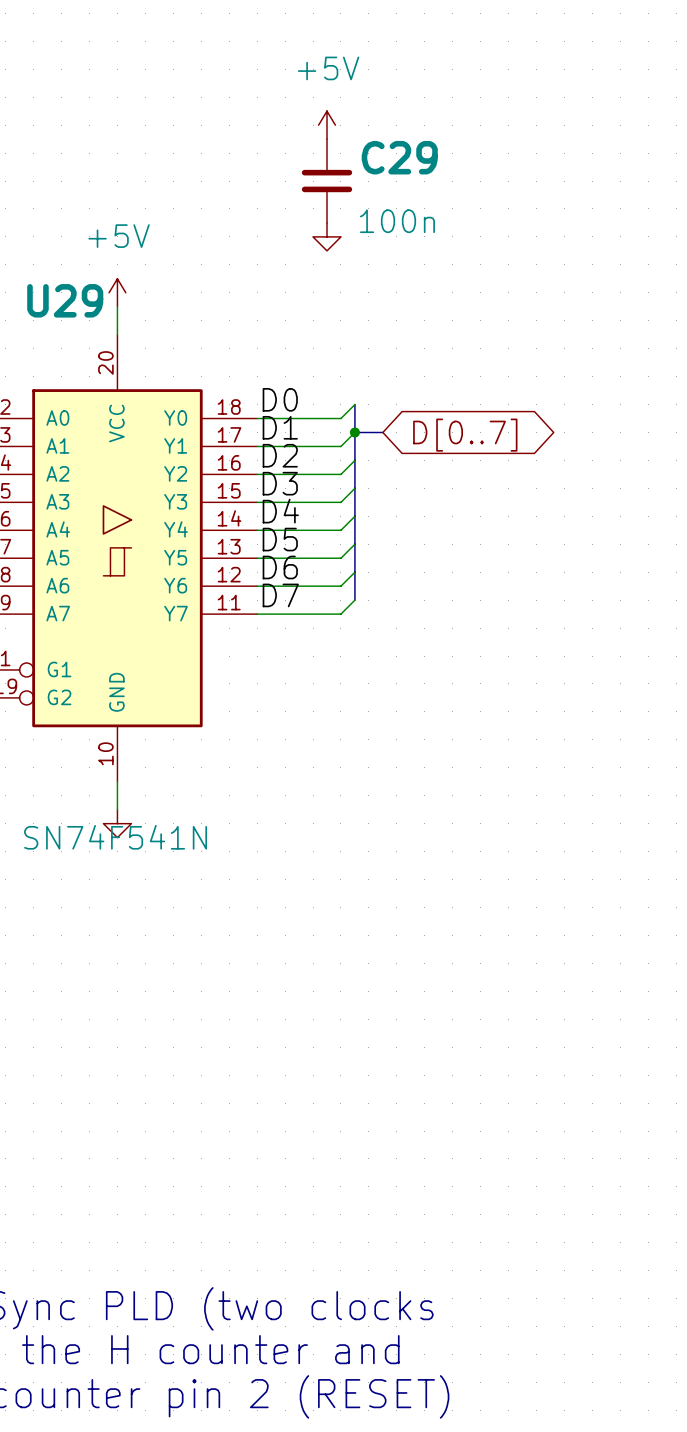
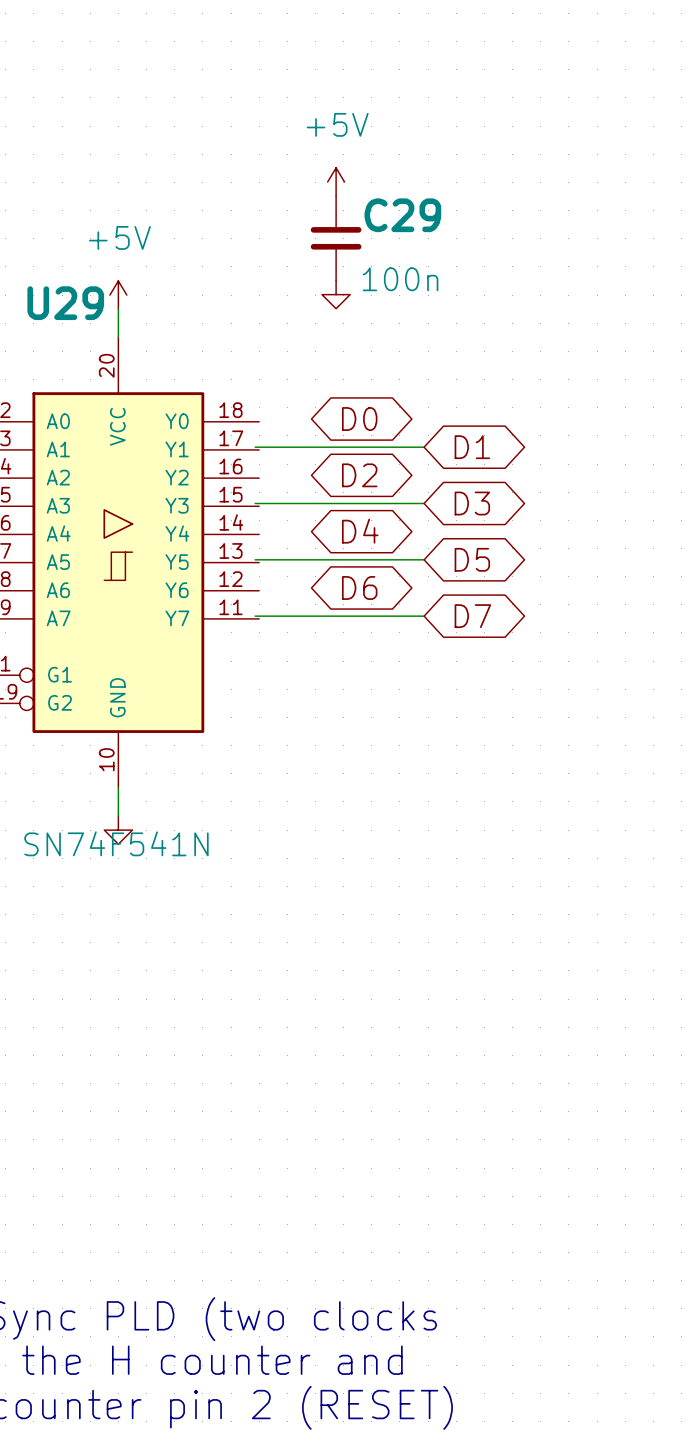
power symbol position: +5V (326, 125) -> +5V (336, 182)
C29 name position: C29 (399, 157) -> C29 (402, 215)
C29 position: (326, 181) -> (336, 238)
C29 value position: 100n (397, 221) -> 100n (400, 279)
power symbol position: (326, 236) -> (336, 294)
label: D0 (280, 399) -> none
wire: (354, 404) (340, 418) (257, 418) -> none
bus: (354, 404) (354, 600) -> none
global label: none -> D0 (359, 419)
label: D1 (280, 427) -> none
wire: (354, 432) (340, 446) (257, 446) -> none
bus: (354, 432) (382, 432) -> none
junction: (354, 432) -> none
global label: D[0..7] (465, 435) -> none
wire: none -> (255, 447) (424, 447)
global label: none -> D1 (472, 447)
label: D2 (280, 455) -> none
wire: (354, 460) (340, 474) (257, 474) -> none
global label: none -> D2 (359, 475)
label: D3 (280, 483) -> none
wire: (354, 488) (340, 502) (257, 502) -> none
wire: none -> (255, 503) (424, 503)
global label: none -> D3 (472, 503)
label: D4 (280, 511) -> none
wire: (354, 516) (340, 530) (257, 530) -> none
global label: none -> D4 (360, 531)
label: D5 (280, 539) -> none
wire: (354, 544) (340, 558) (257, 558) -> none
wire: none -> (255, 559) (424, 559)
global label: none -> D5 (472, 559)
label: D6 (280, 567) -> none
wire: (354, 572) (340, 586) (257, 586) -> none
global label: none -> D6 (359, 587)
label: D7 (280, 595) -> none
wire: (354, 600) (340, 614) (257, 614) -> none
wire: none -> (255, 616) (424, 616)
global label: none -> D7 (472, 616)

